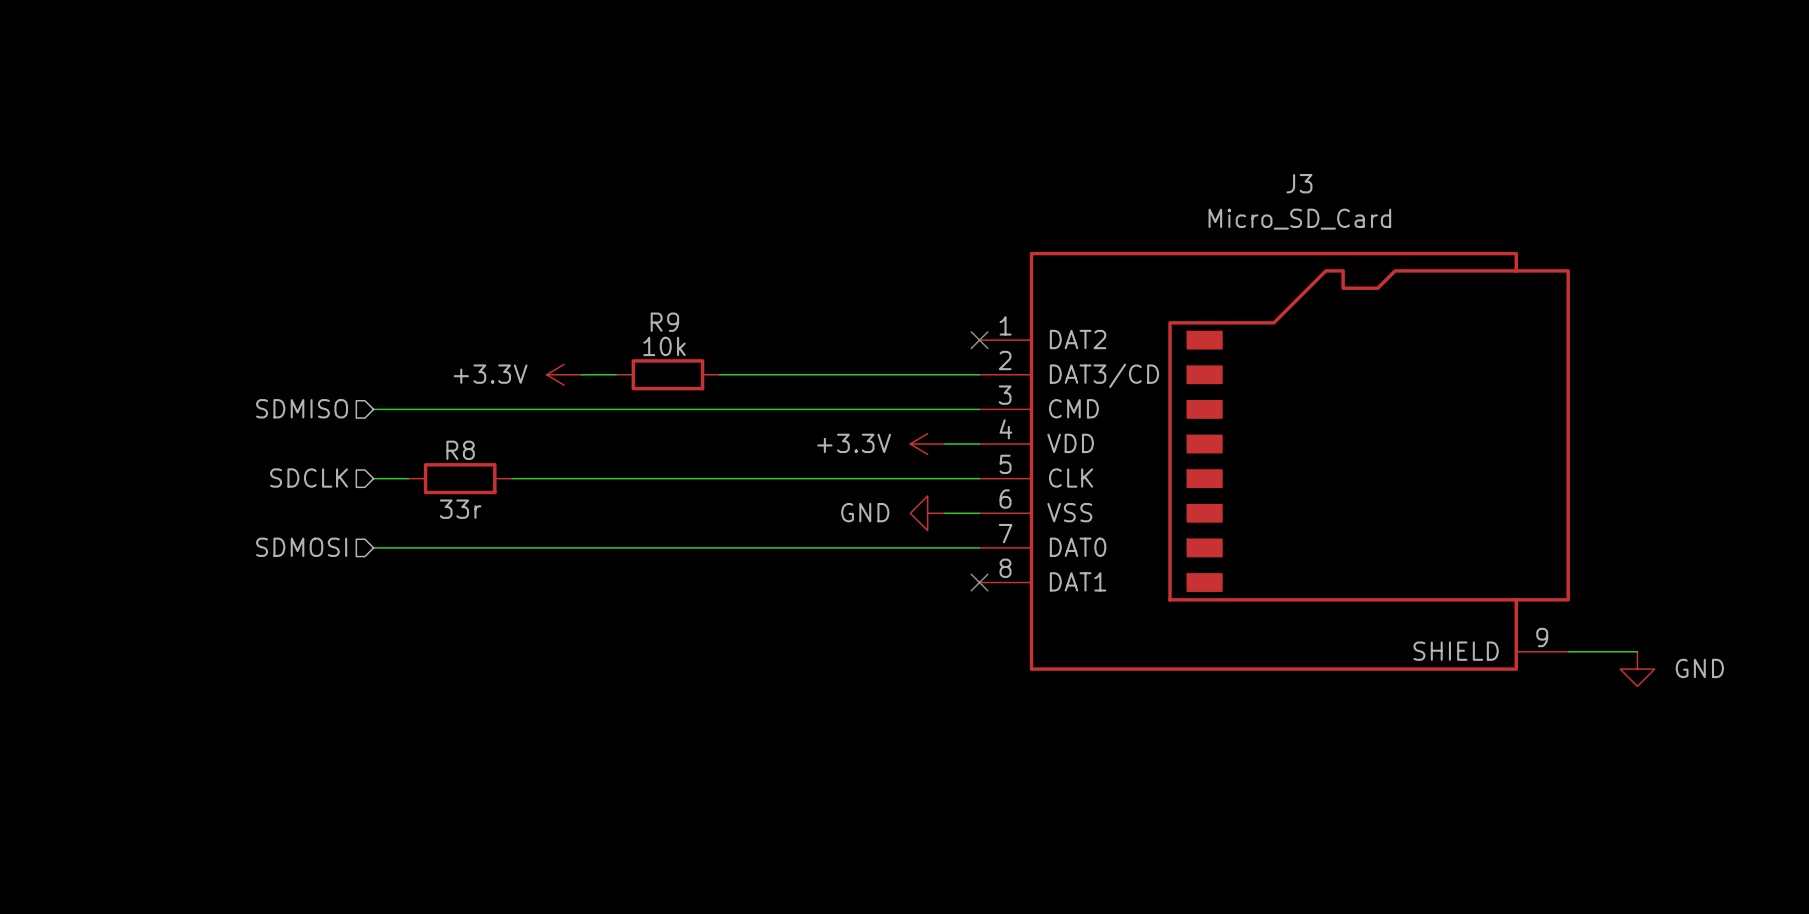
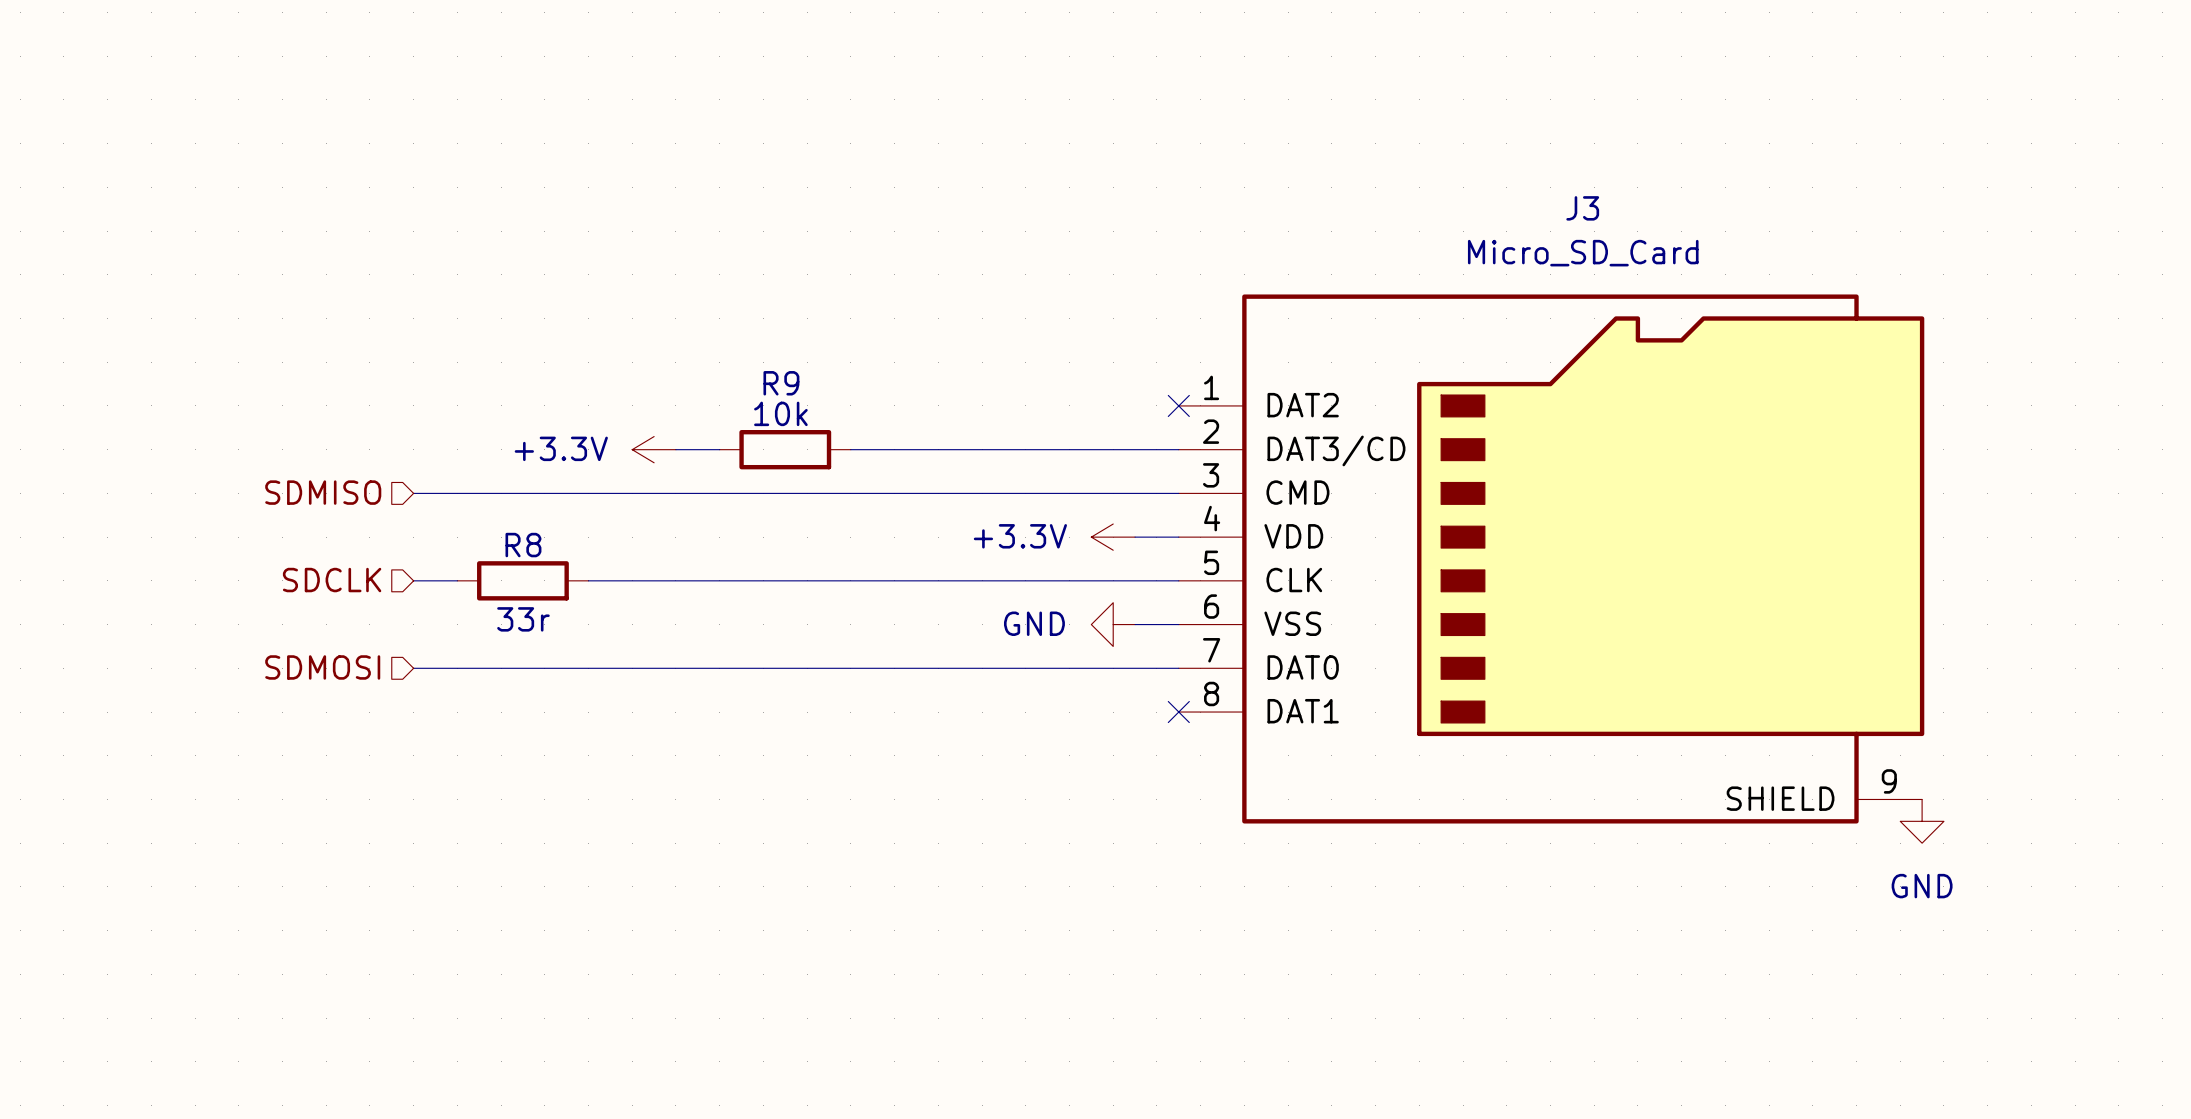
wire: (1568, 651) (1637, 651) -> none
power symbol text position: GND (1699, 668) -> GND (1922, 886)
power symbol position: GND (1637, 669) -> GND (1922, 821)

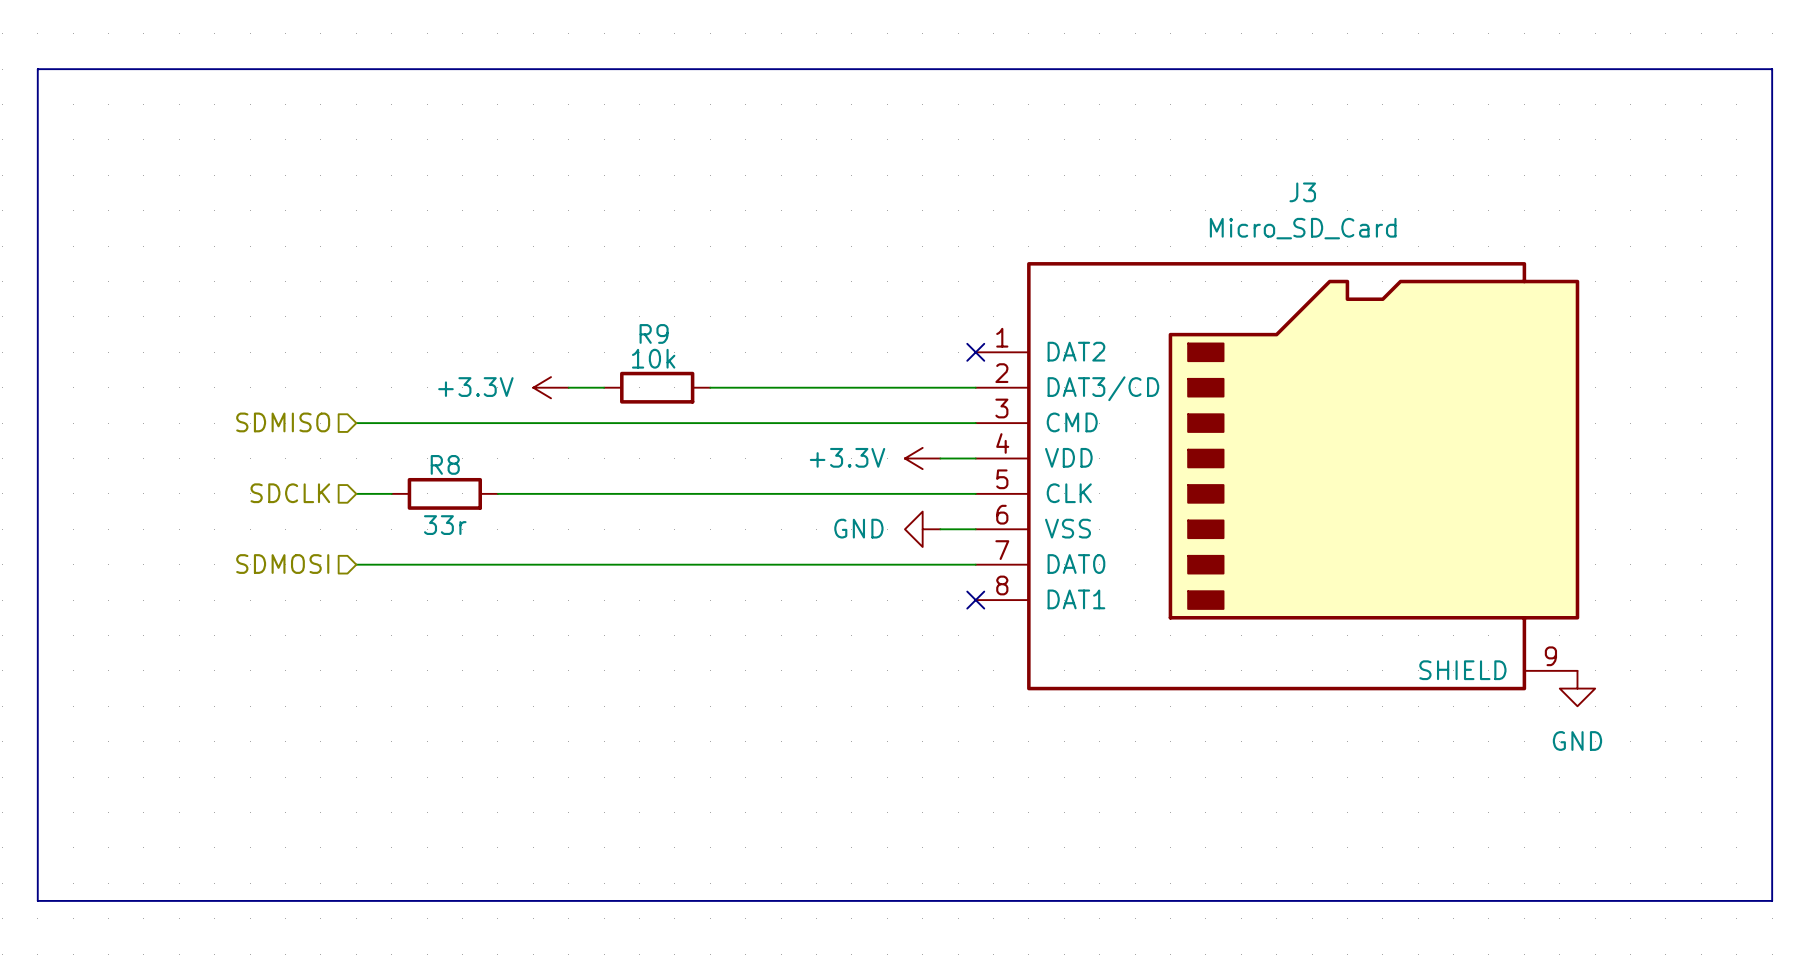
line: none -> (37, 69) (1772, 69) (1772, 900) (37, 900) (37, 69)

